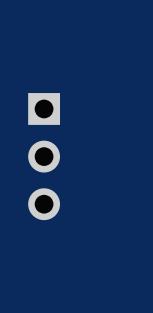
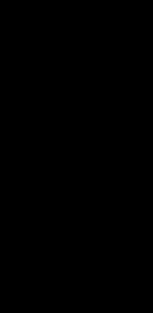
part: (44, 156) -> none

